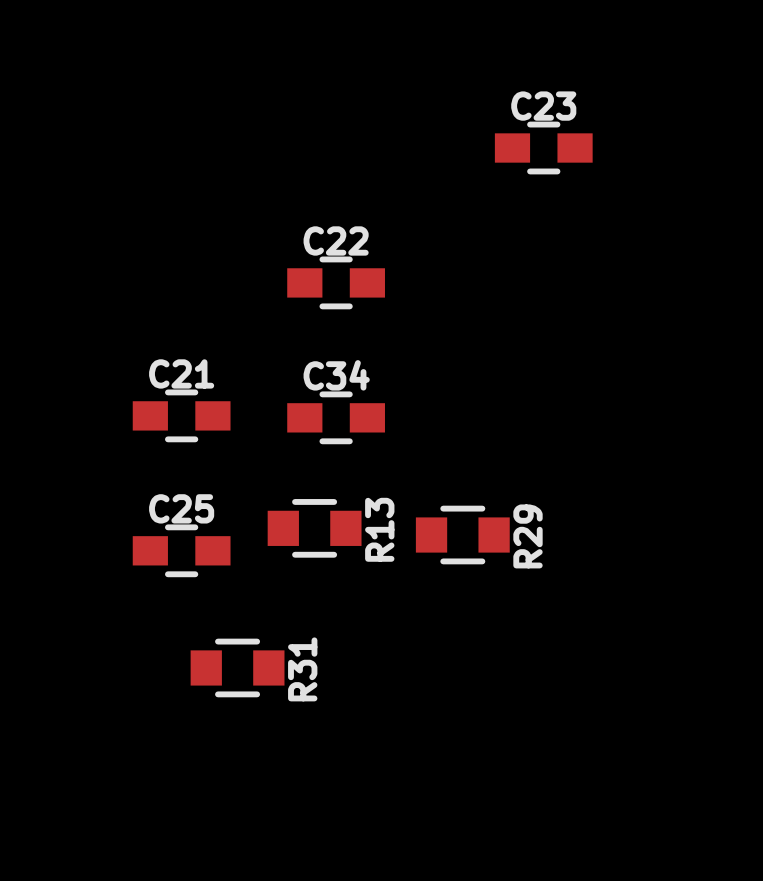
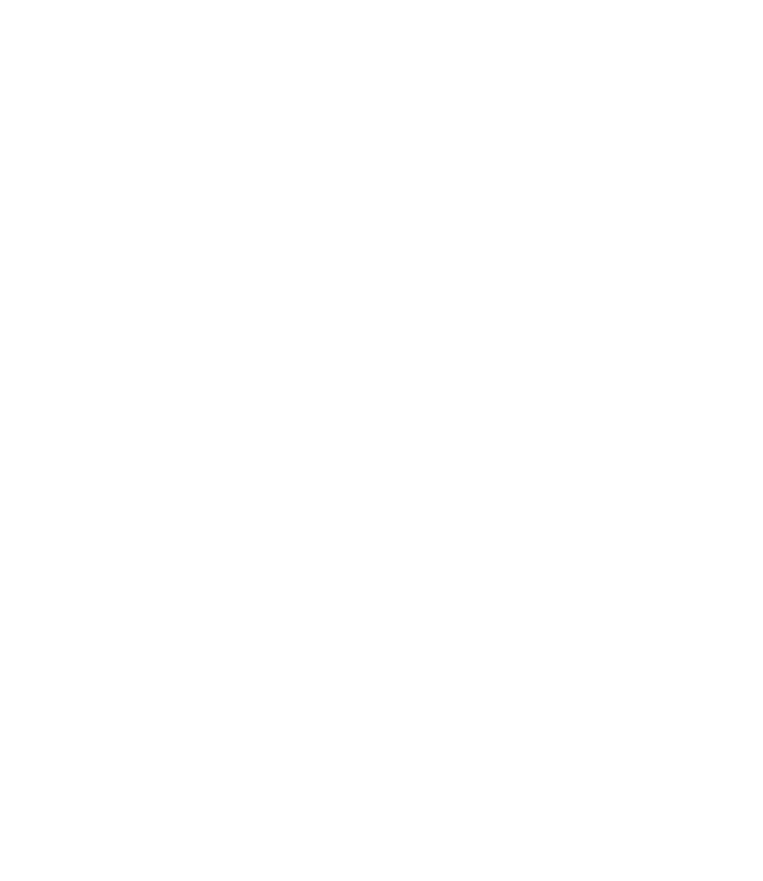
C23: (543, 148) -> none
C22: (336, 282) -> none
C21: (181, 415) -> none
C34: (336, 417) -> none
R13: (314, 528) -> none
R29: (462, 535) -> none
C25: (181, 550) -> none
R31: (237, 667) -> none

